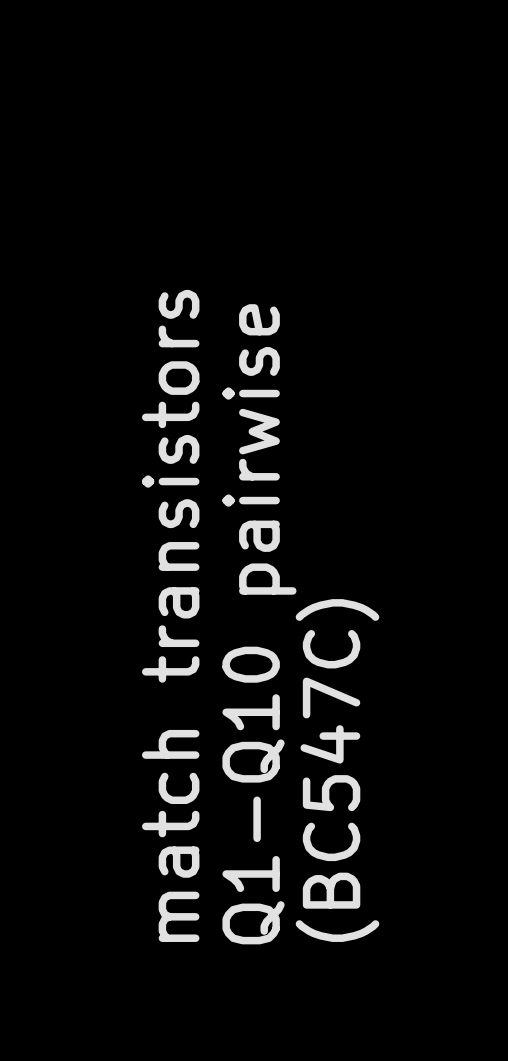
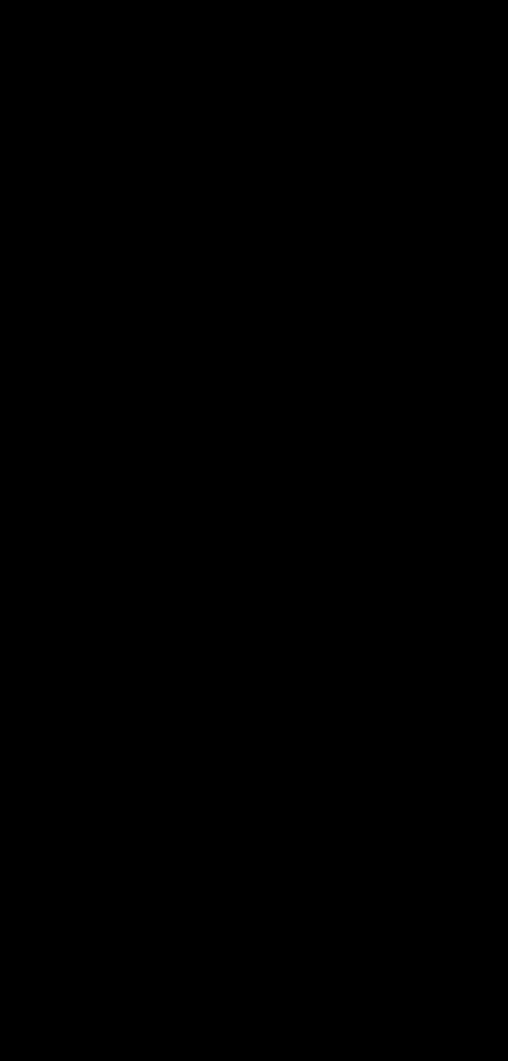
text: match transistors (170, 615) -> none
text: Q1-Q10 pairwise (259, 624) -> none
text: (BC547C) (337, 770) -> none

